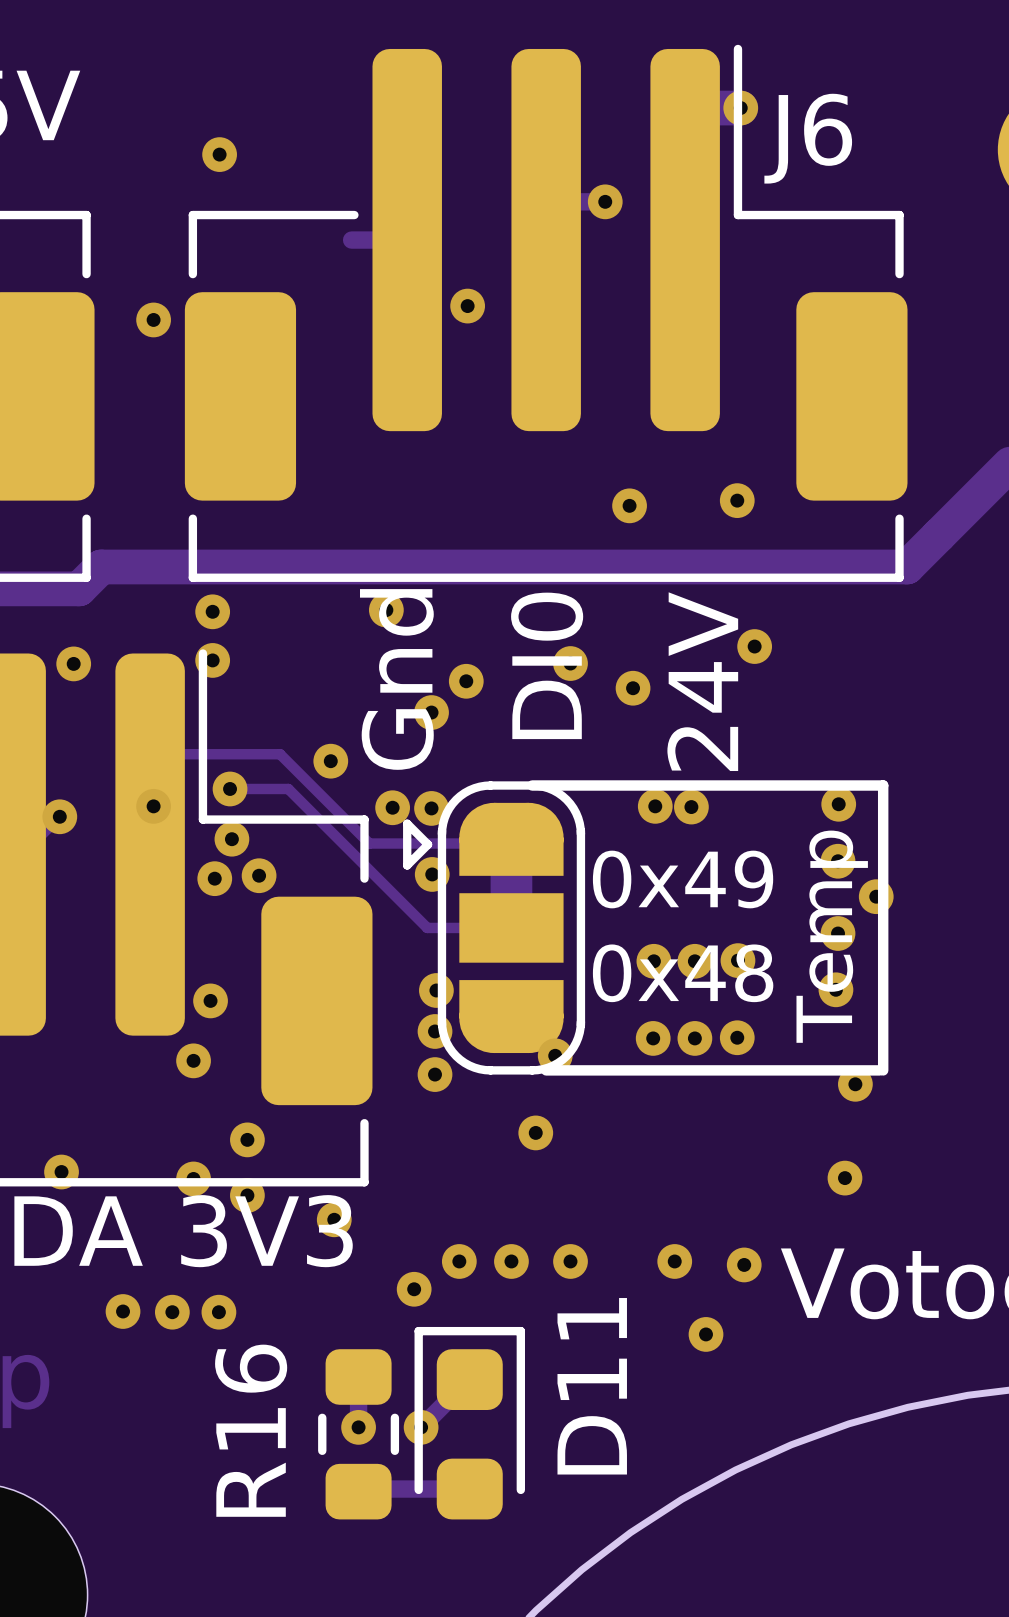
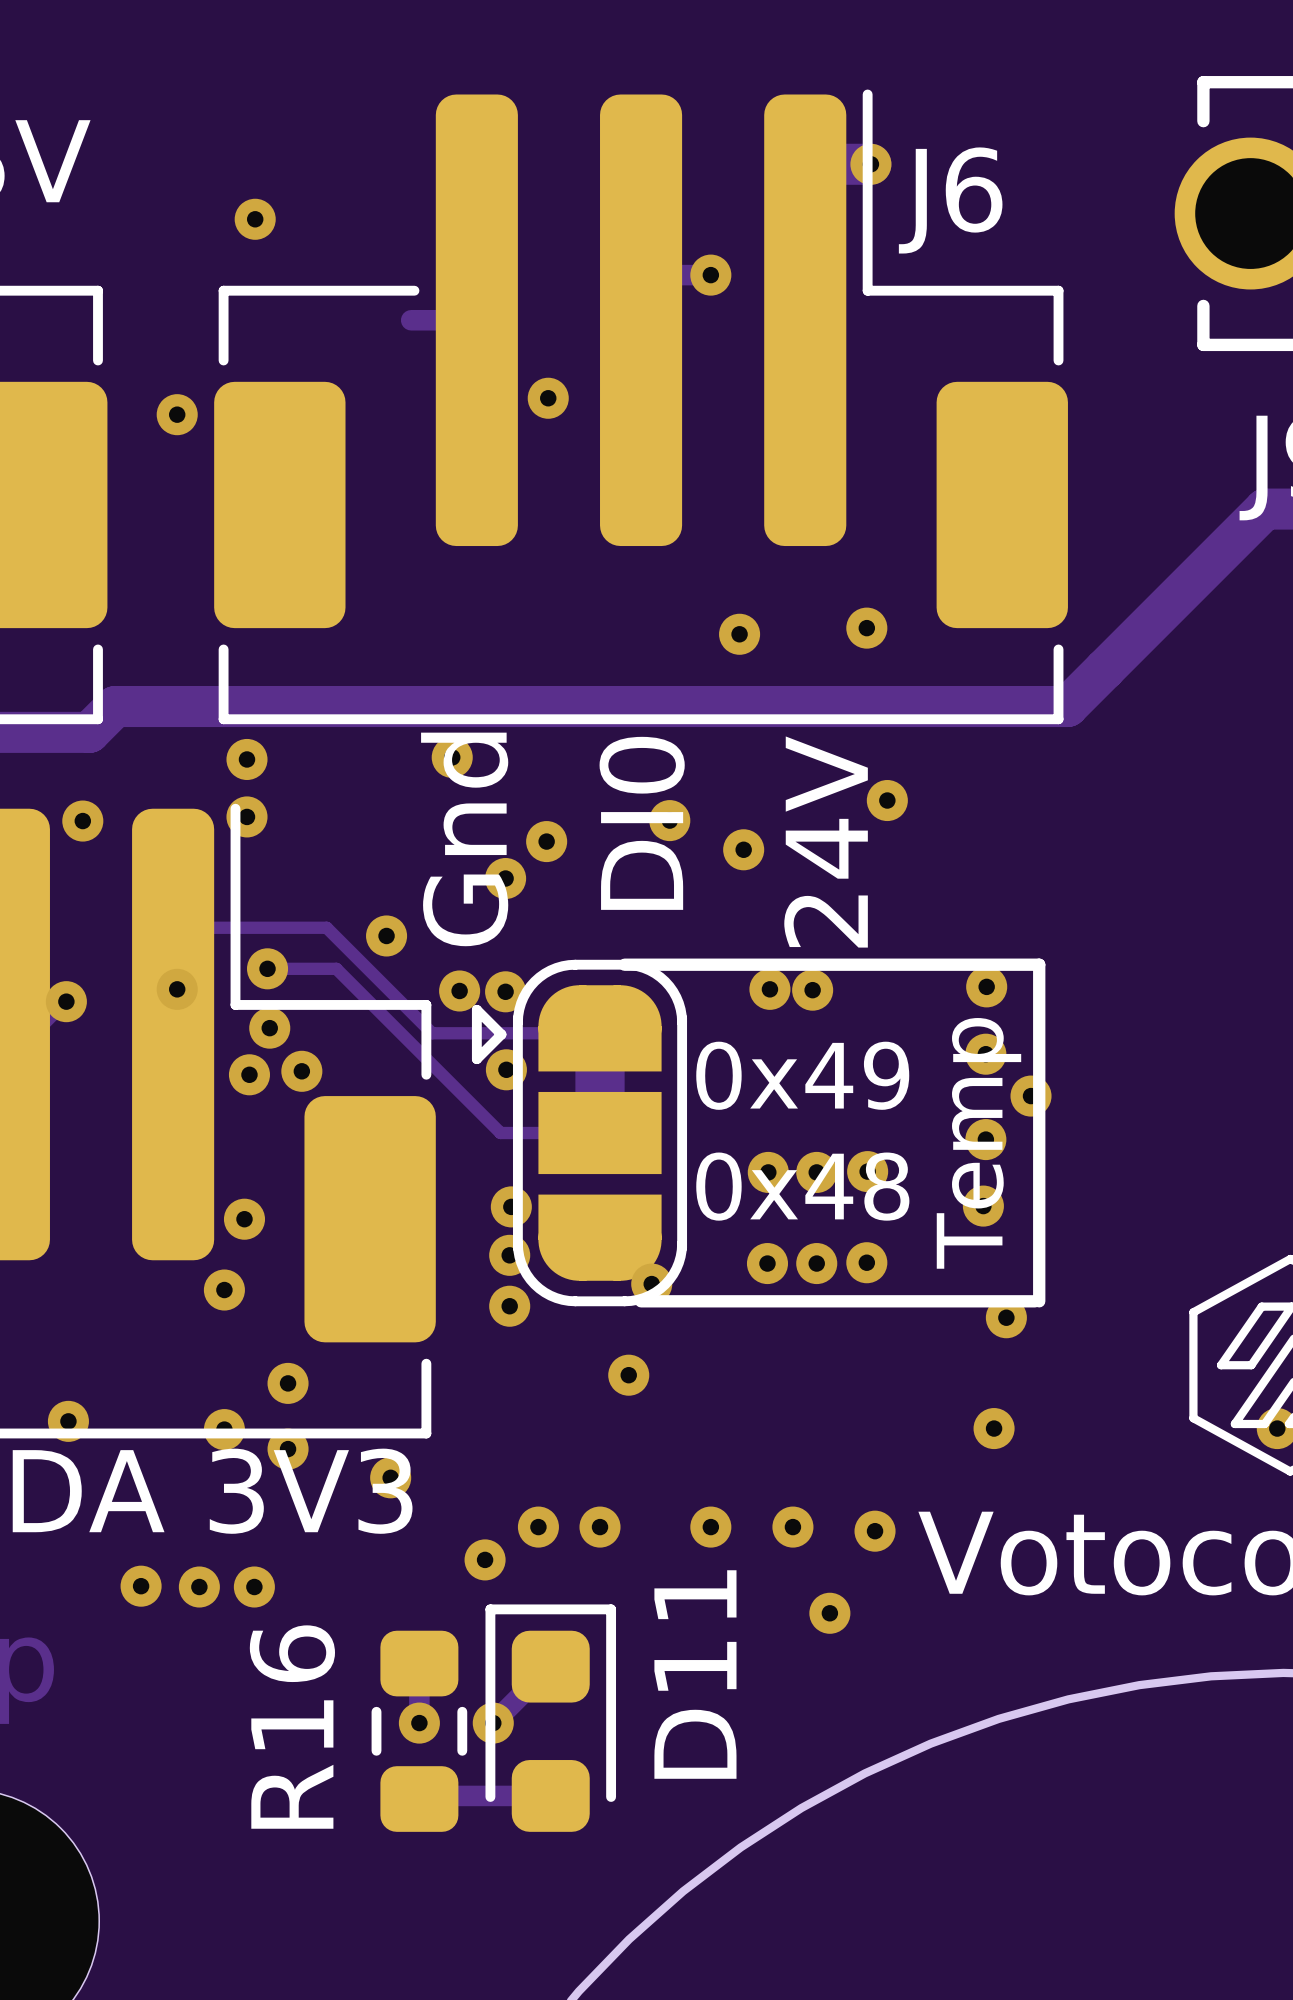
via position: (570, 1261) -> (710, 1527)

